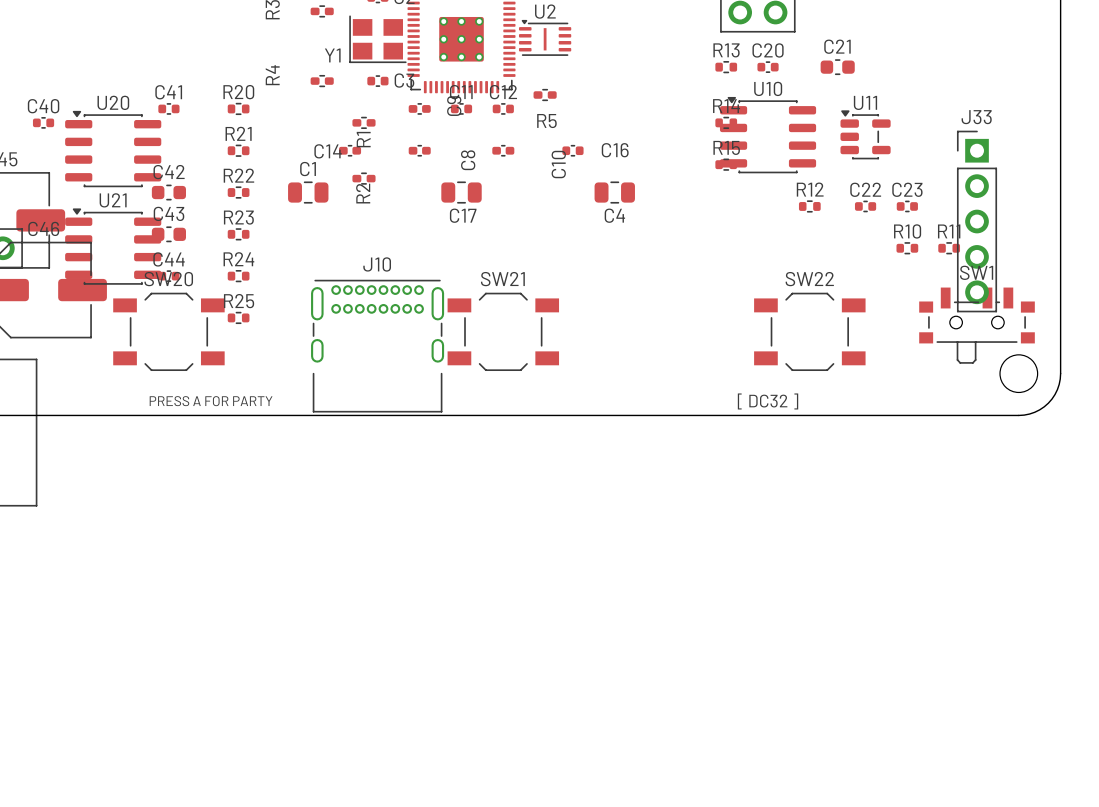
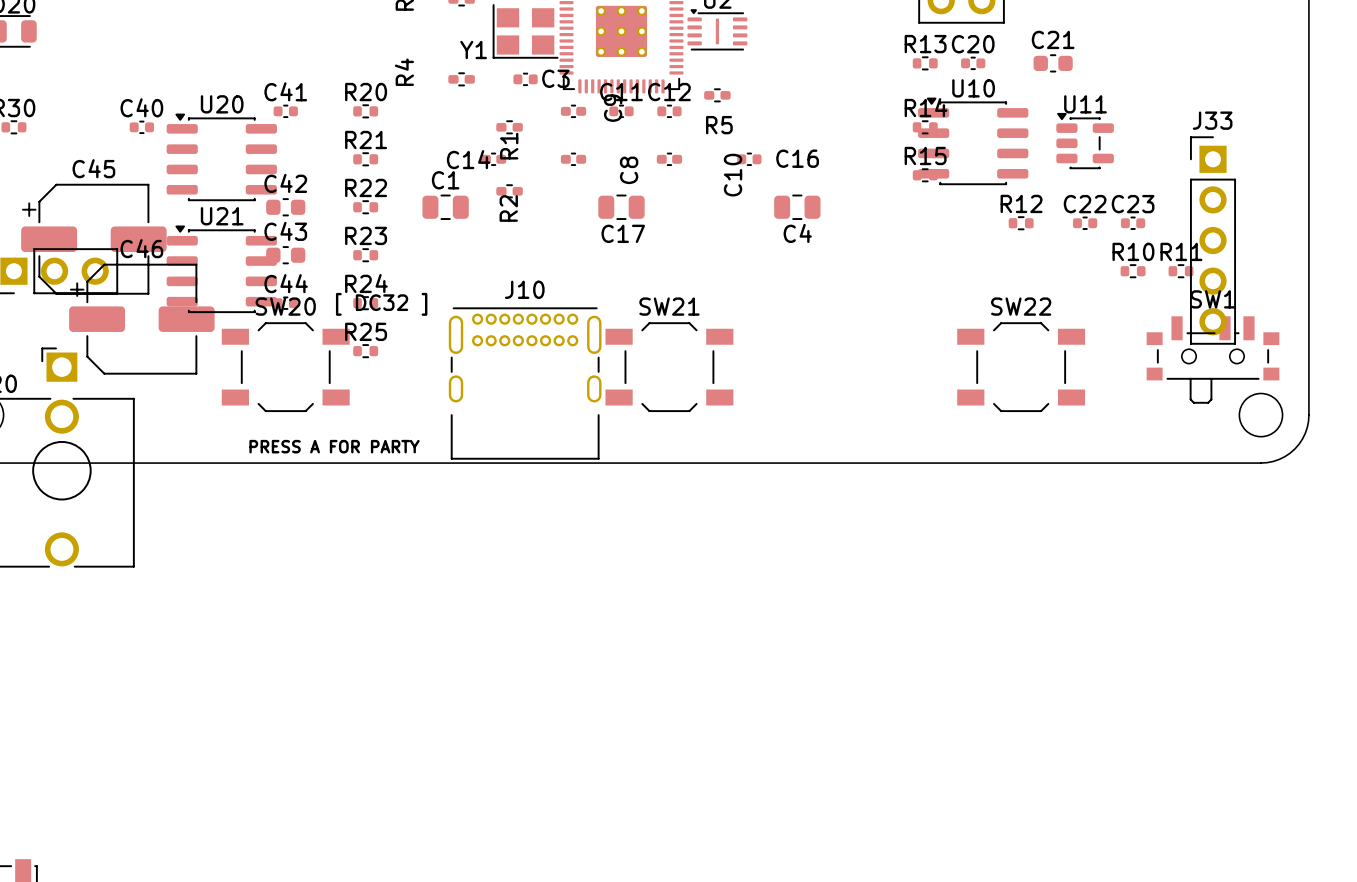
text: none -> [ DC32 ] (381, 304)
text: [ DC32 ] (768, 401) -> none

